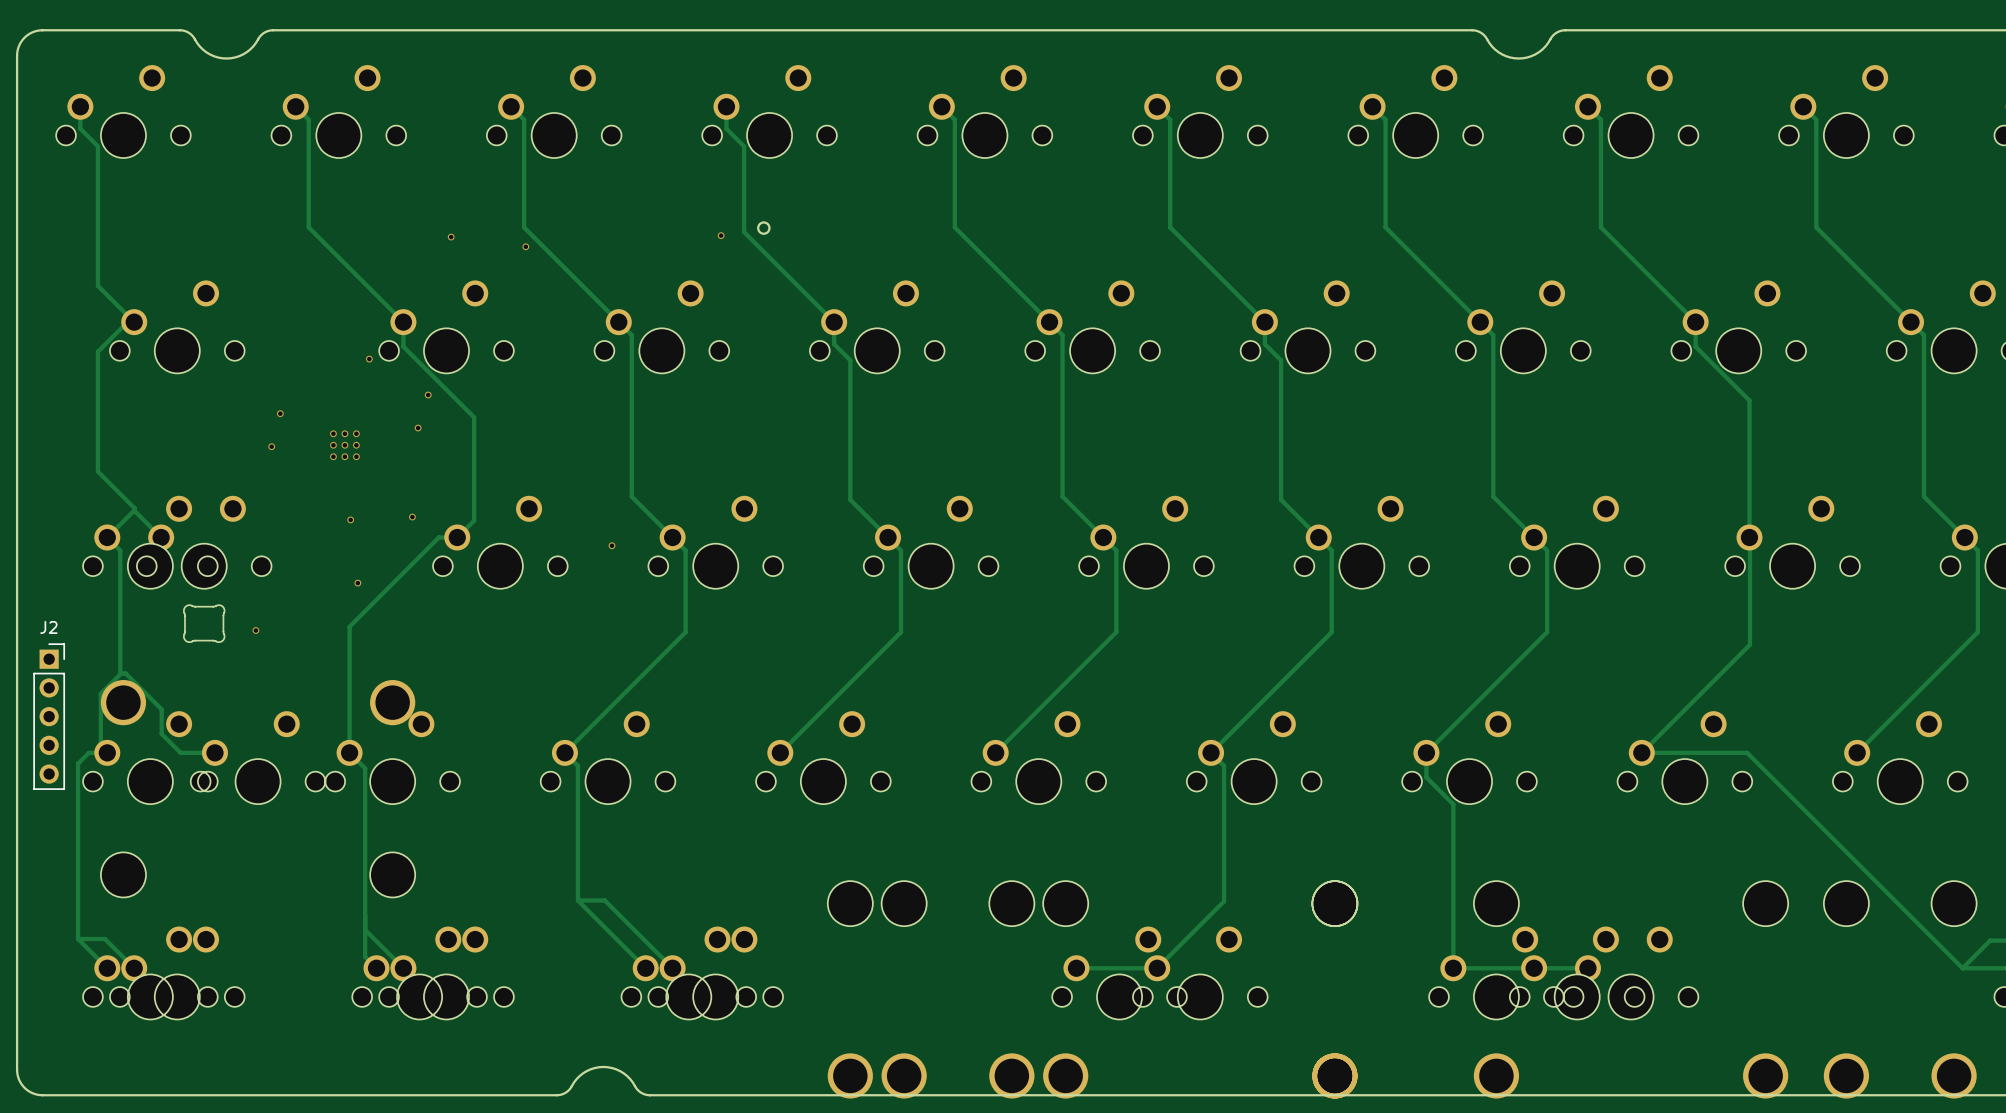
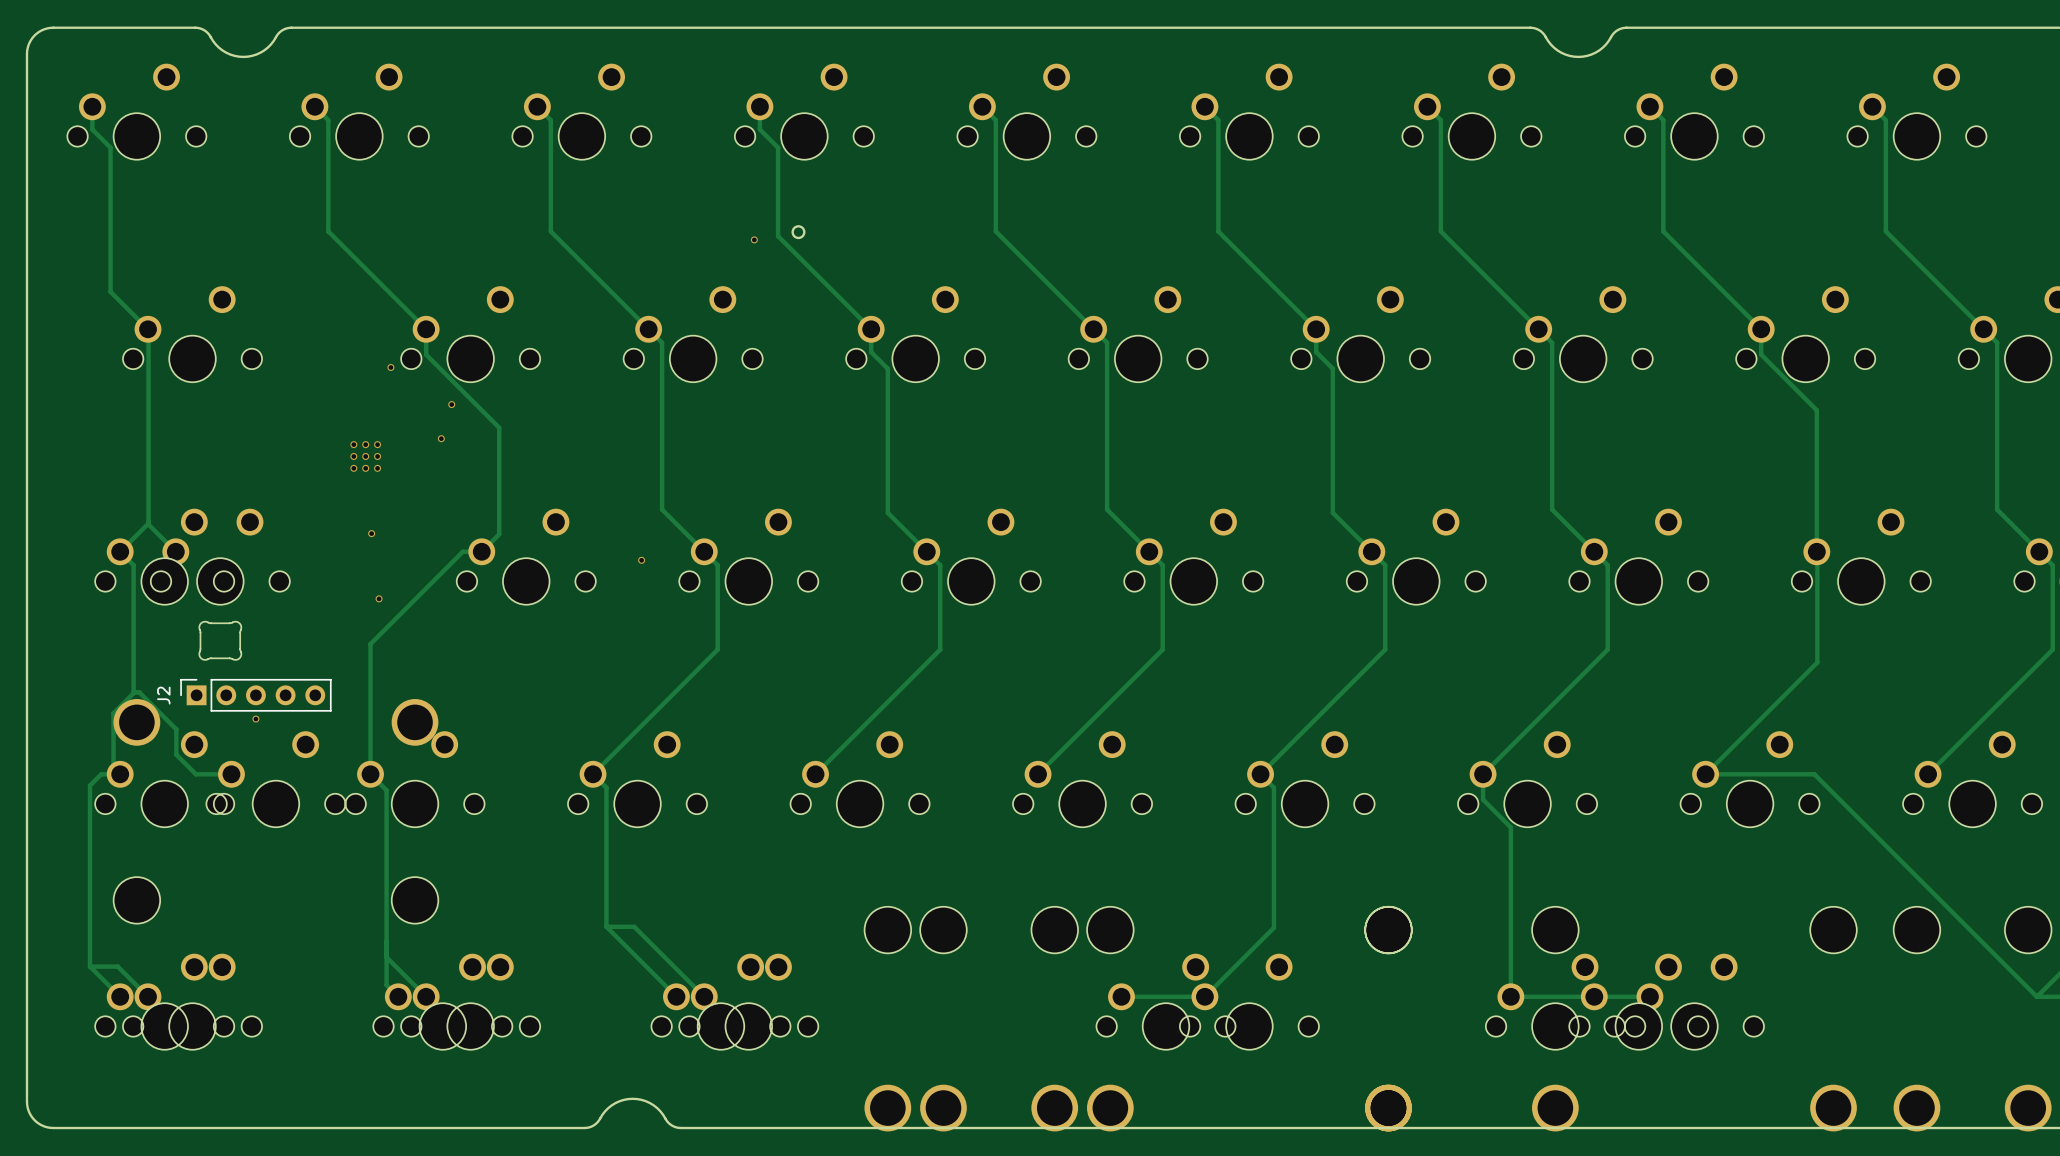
via: (451, 237) -> none
via: (525, 246) -> none
track: (134, 322) (127, 322) (97, 351) (97, 471) (134, 508) -> (148, 329) (148, 521)
via: (280, 413) -> none
via: (271, 446) -> none
via: (412, 517) -> none
via: (255, 630) -> none
via: none -> (255, 719)
J2 rotation: 0° (49, 716) -> 90° counterclockwise (255, 695)
J2 position: (49, 716) -> (255, 695)

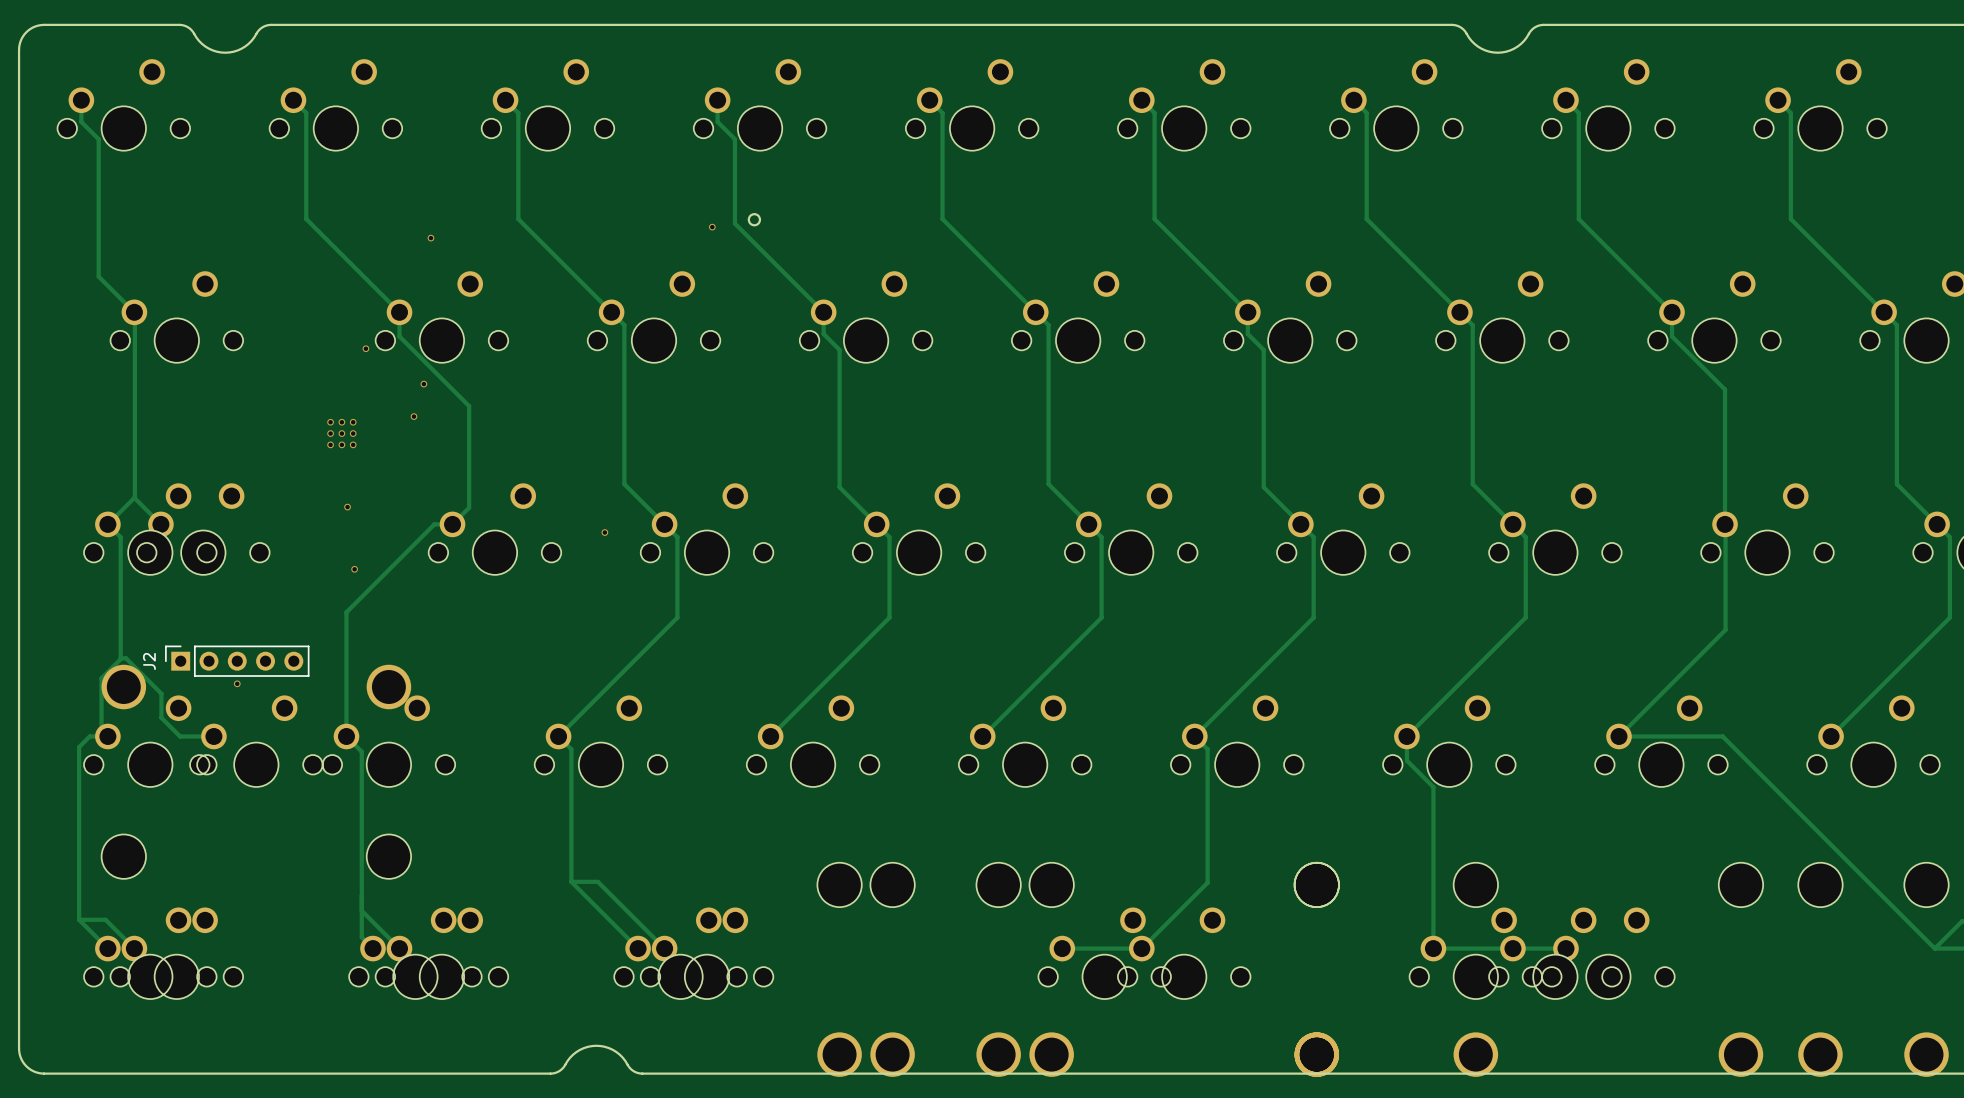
via: none -> (430, 238)
part: (220, 640) -> none

